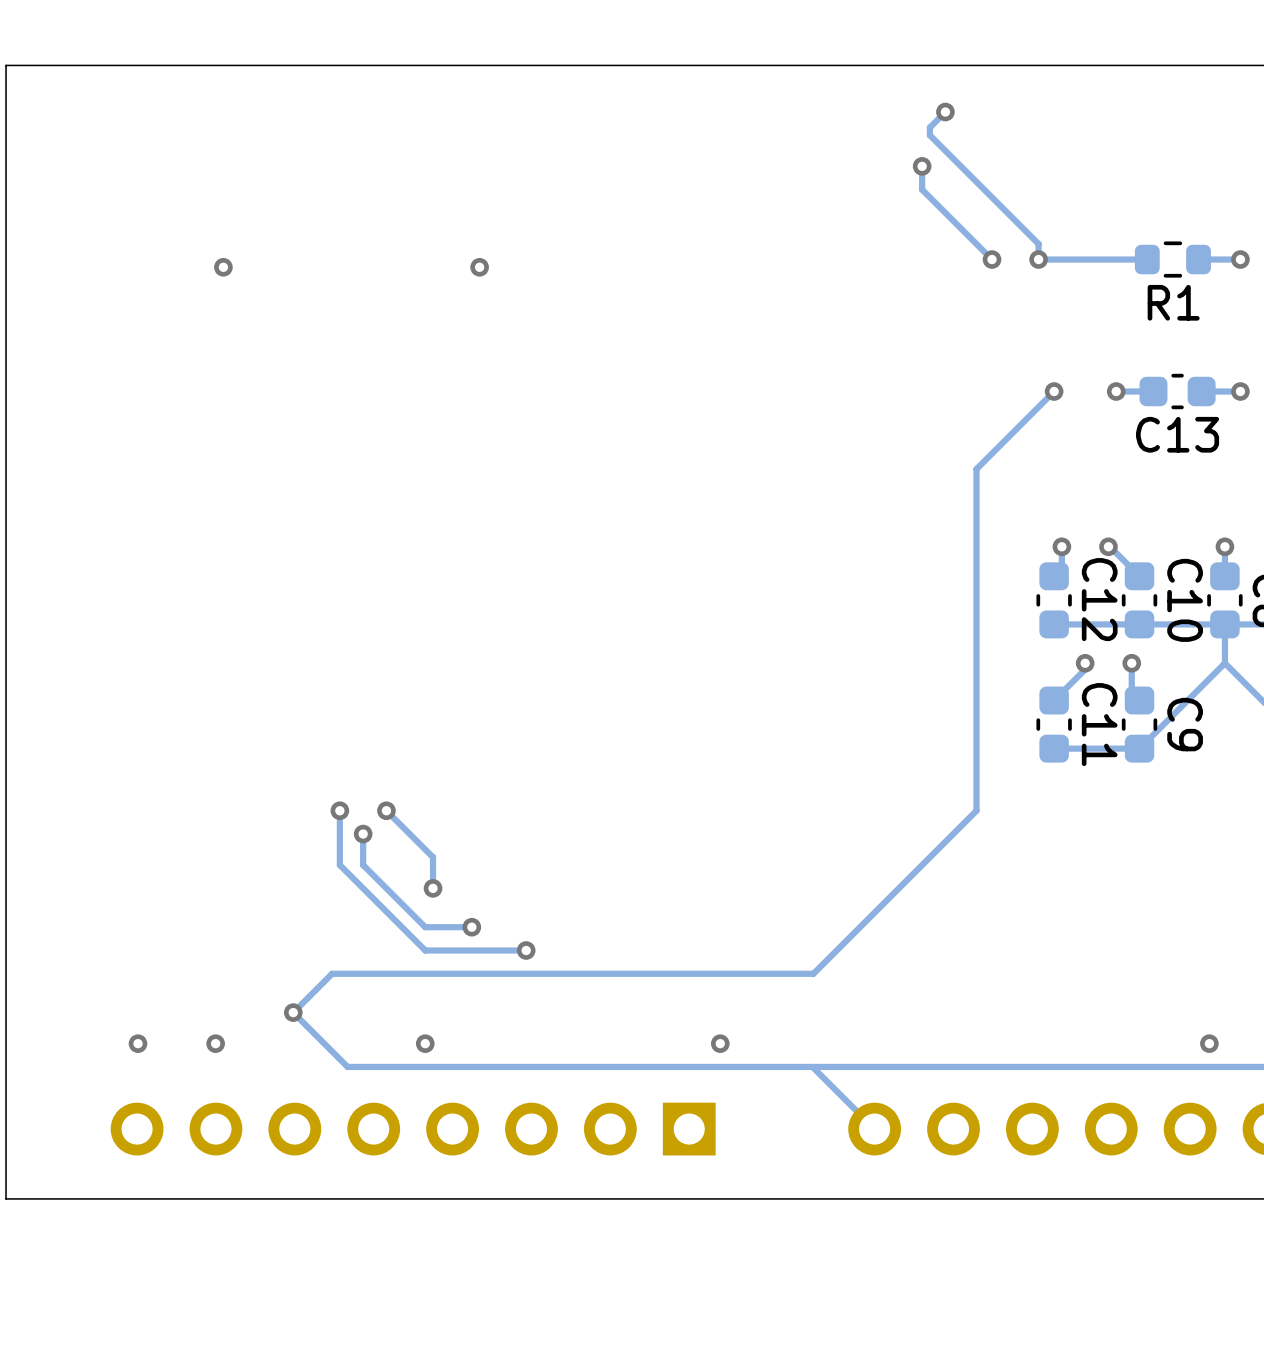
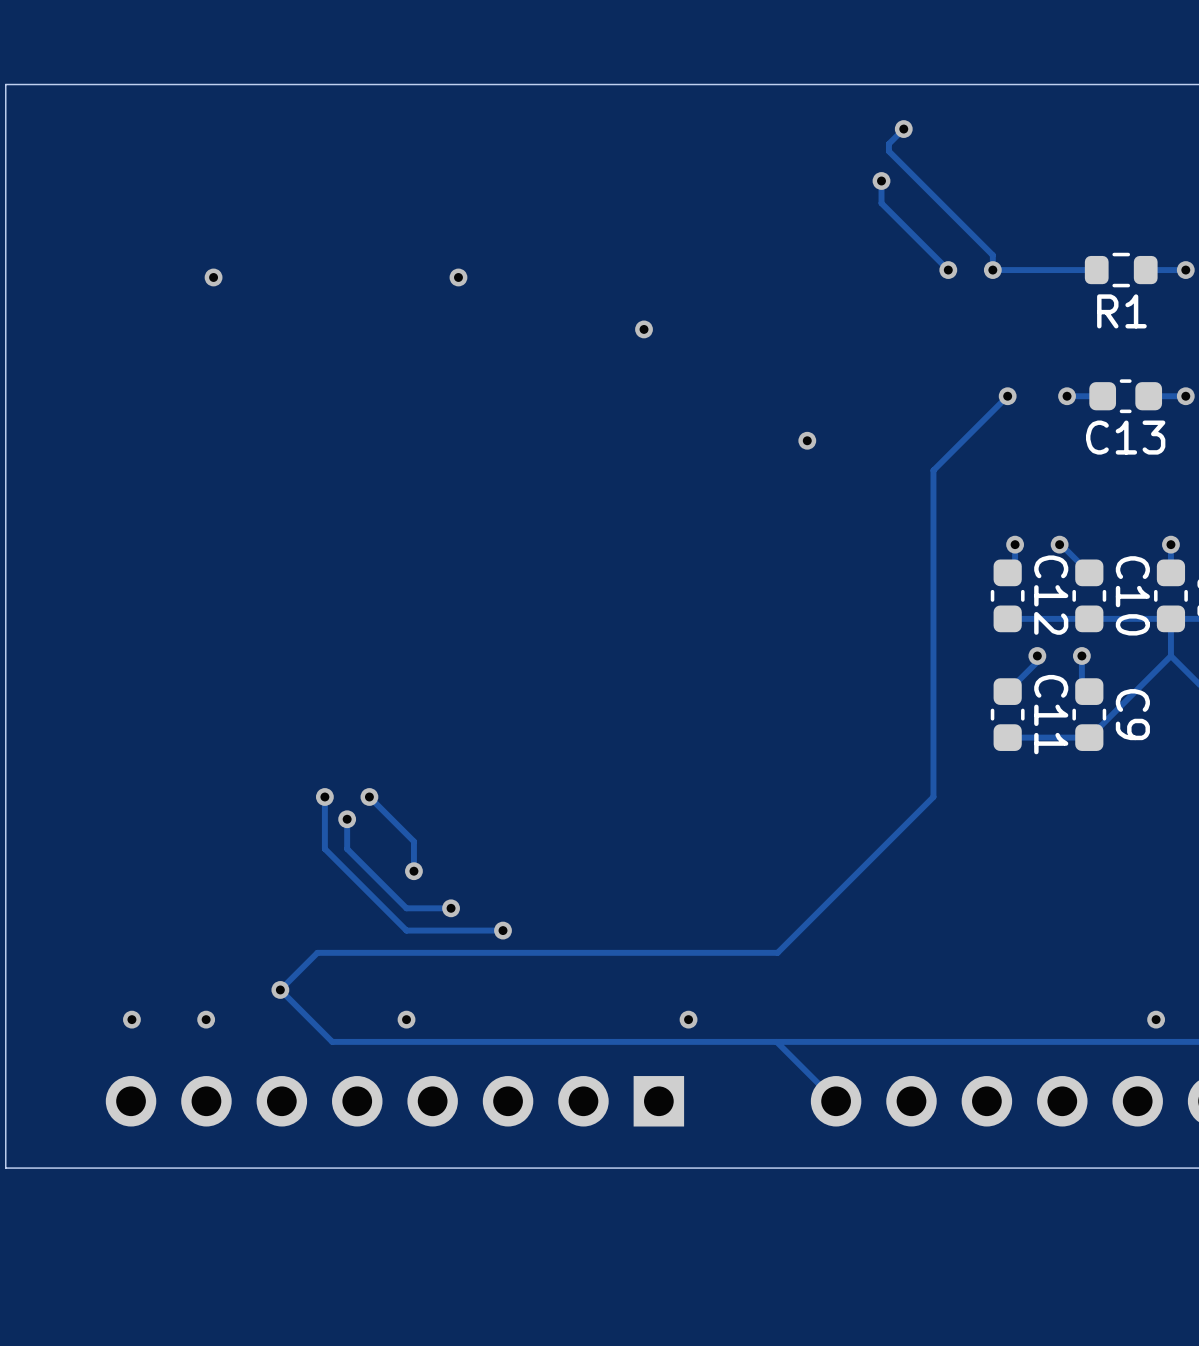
via: none -> (644, 329)
via: none -> (807, 440)

